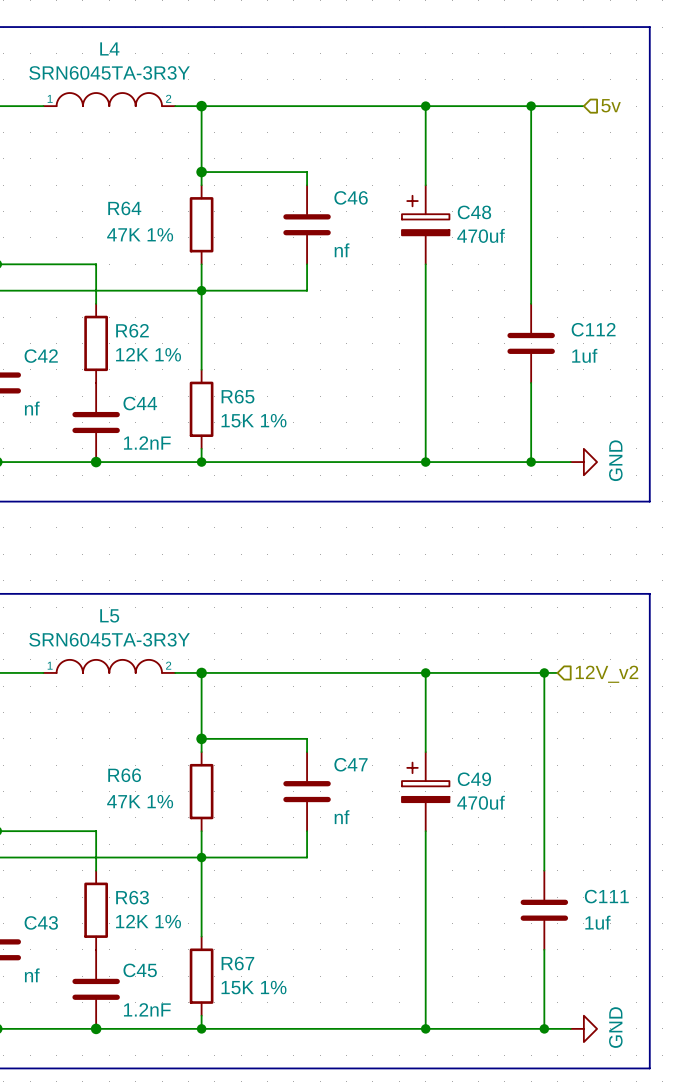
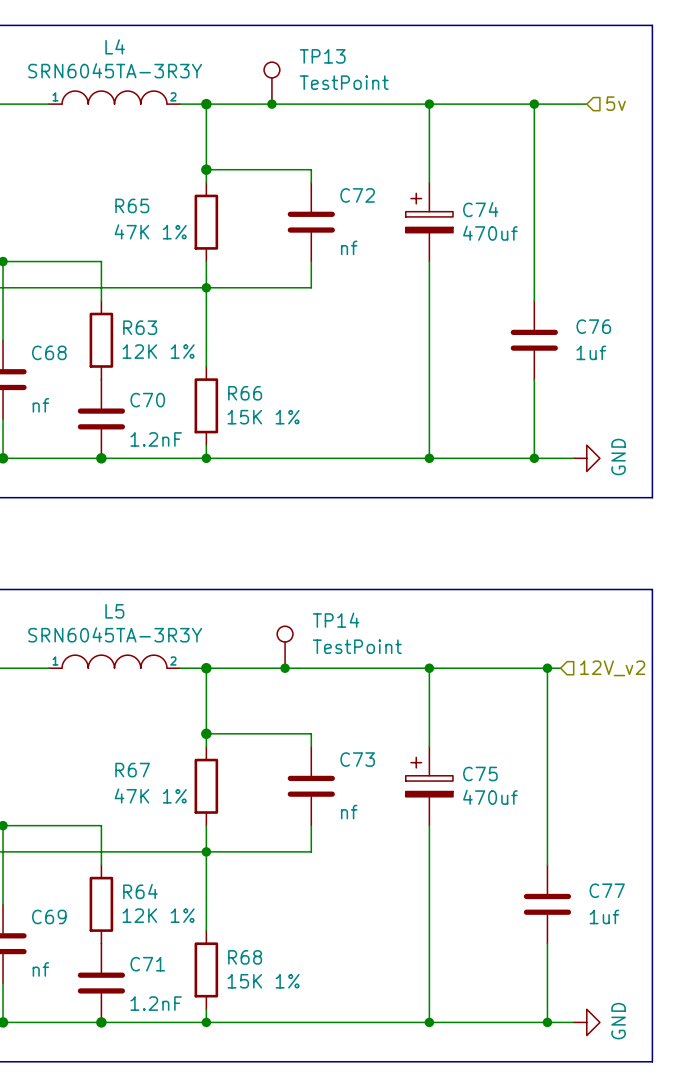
TP13: none -> TestPoint (271, 83)
junction: none -> (271, 104)
C46 name: C46 (351, 197) -> C72 (357, 195)
R64 name: R64 (124, 208) -> R65 (132, 205)
C48 name: C48 (474, 212) -> C74 (480, 209)
C112 name: C112 (593, 329) -> C76 (593, 326)
R62 name: R62 (132, 330) -> R63 (140, 327)
C42 name: C42 (41, 356) -> C68 (49, 352)
R65 name: R65 (238, 396) -> R66 (245, 393)
C44 name: C44 (140, 403) -> C70 (147, 400)
TP14: none -> TestPoint (285, 647)
junction: none -> (285, 668)
C47 name: C47 (351, 764) -> C73 (357, 759)
R66 name: R66 (124, 775) -> R67 (132, 770)
C49 name: C49 (474, 779) -> C75 (480, 773)
C111 name: C111 (606, 896) -> C77 (607, 890)
R63 name: R63 (132, 897) -> R64 (140, 891)
C43 name: C43 (41, 922) -> C69 (49, 916)
R67 name: R67 (237, 963) -> R68 (245, 957)
C45 name: C45 (140, 970) -> C71 (147, 964)

